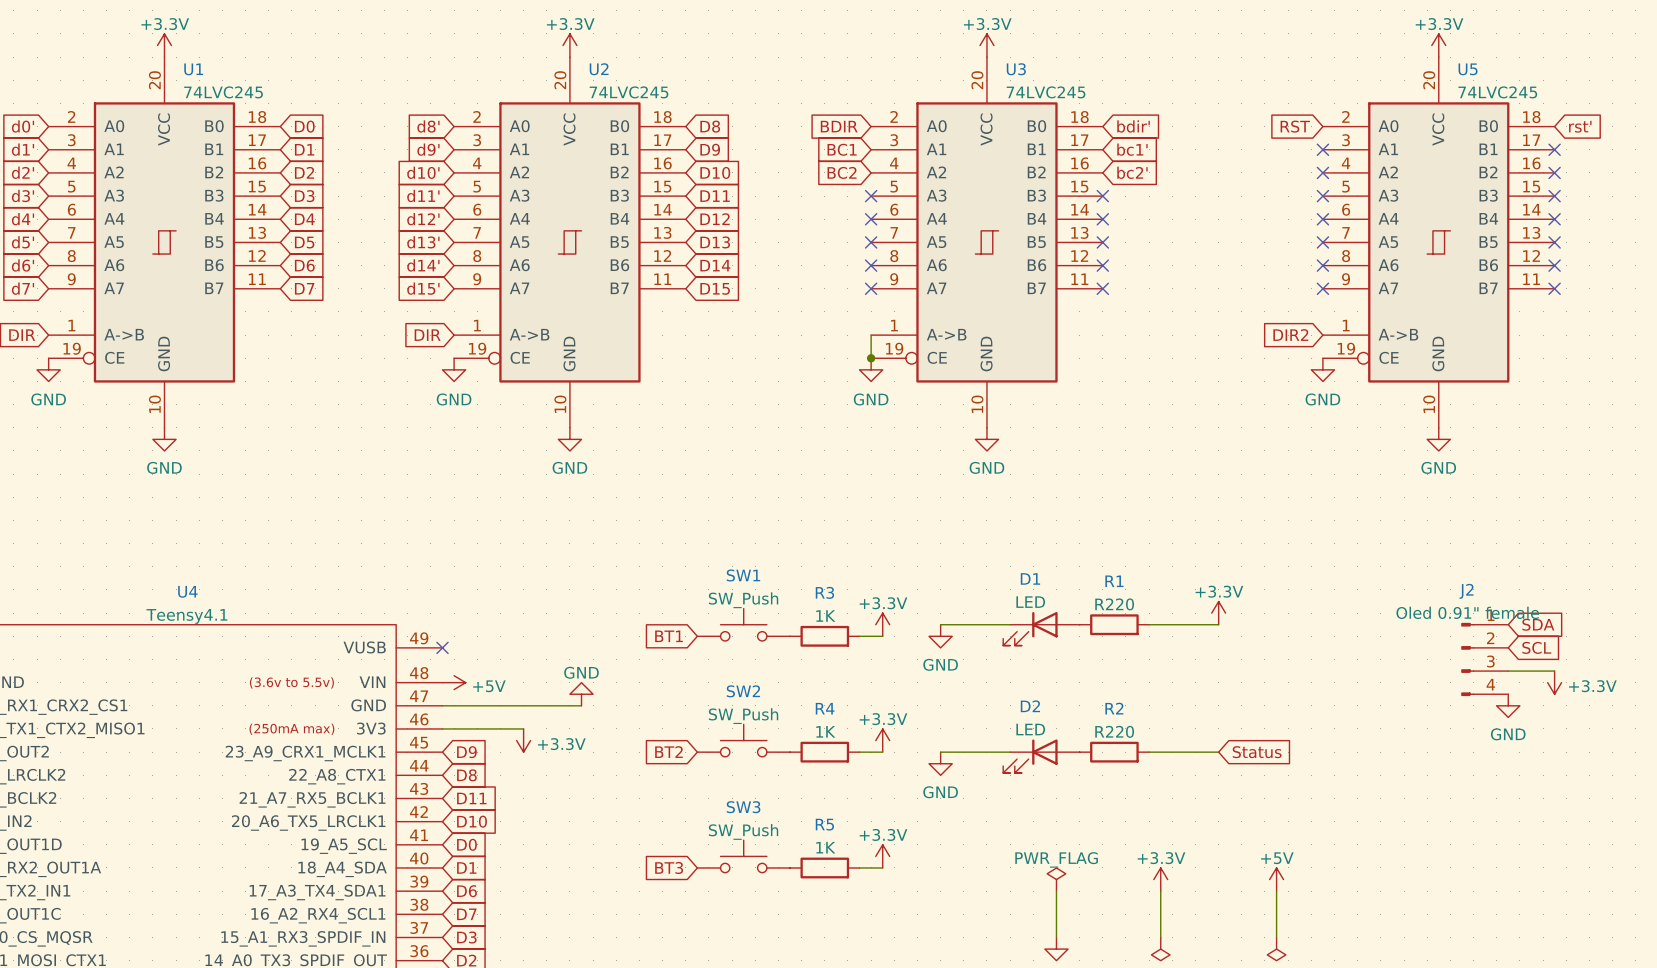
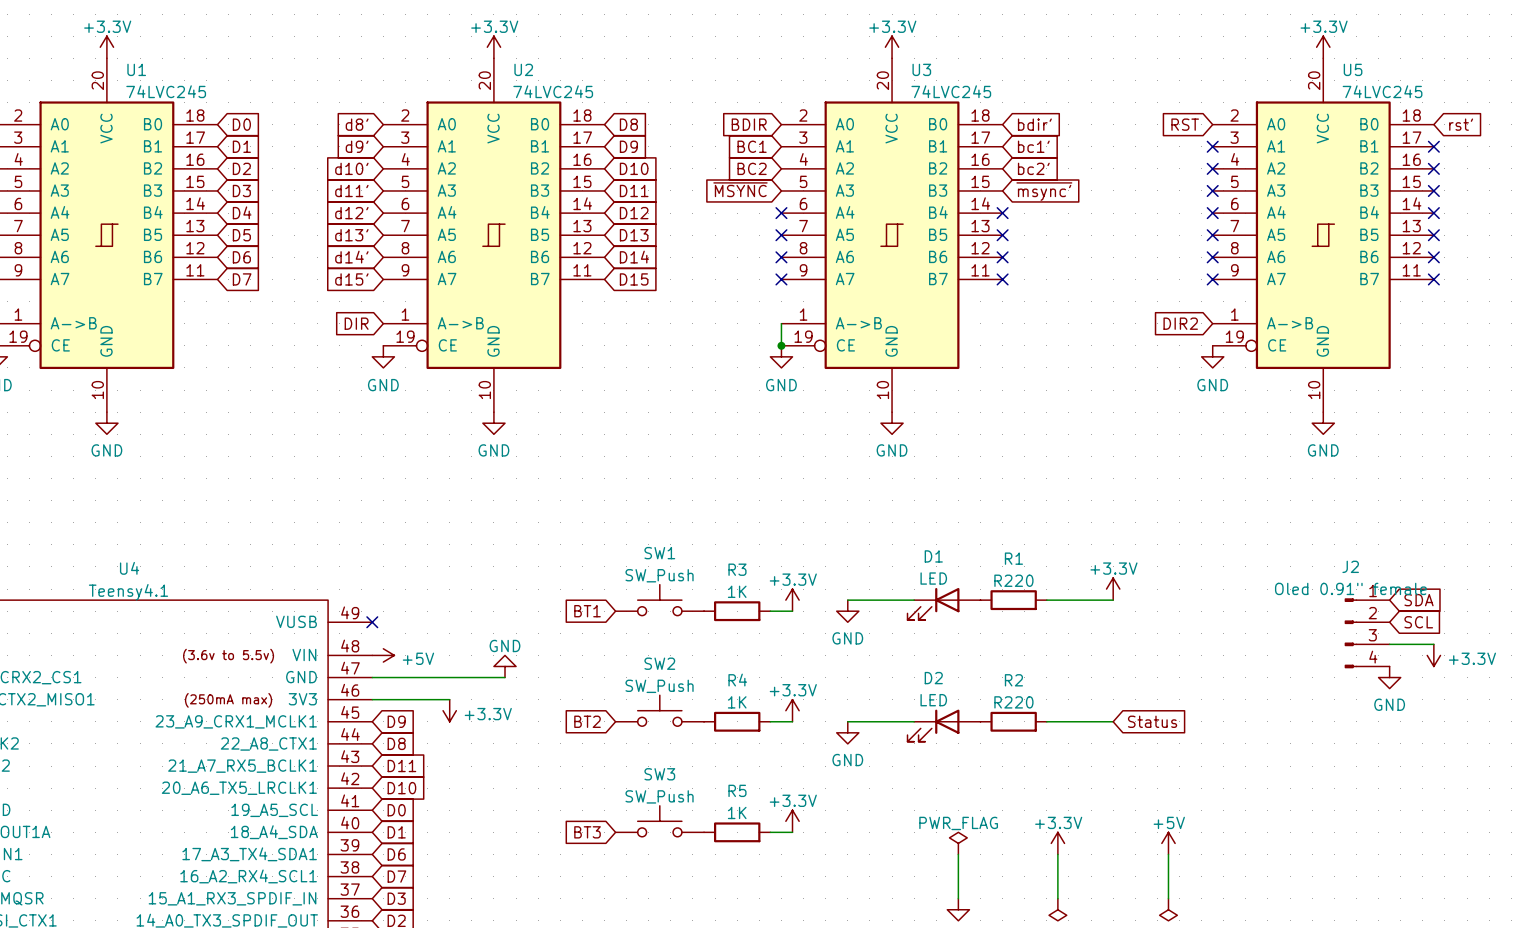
global label: none -> ~{MSYNC} (740, 189)
no-connect mark: (871, 196) -> none
no-connect mark: (1102, 196) -> none
global label: none -> ~{msync'} (1044, 191)

